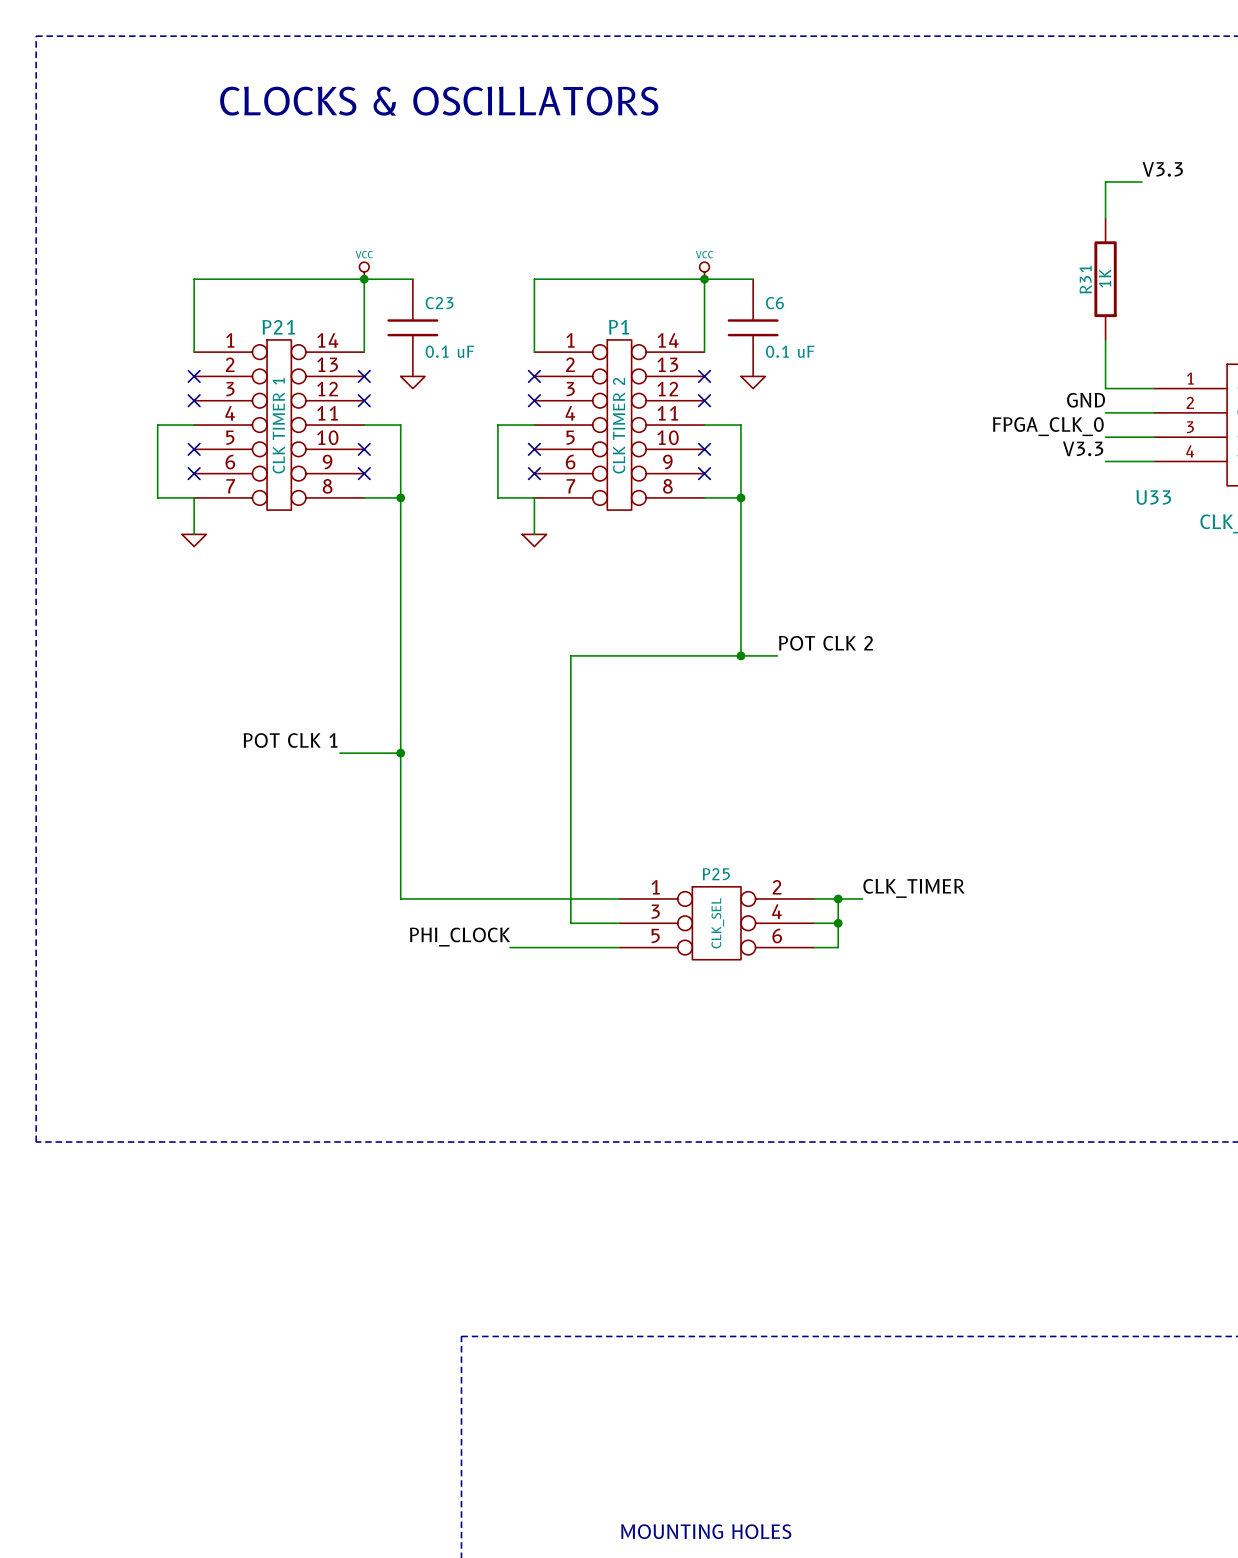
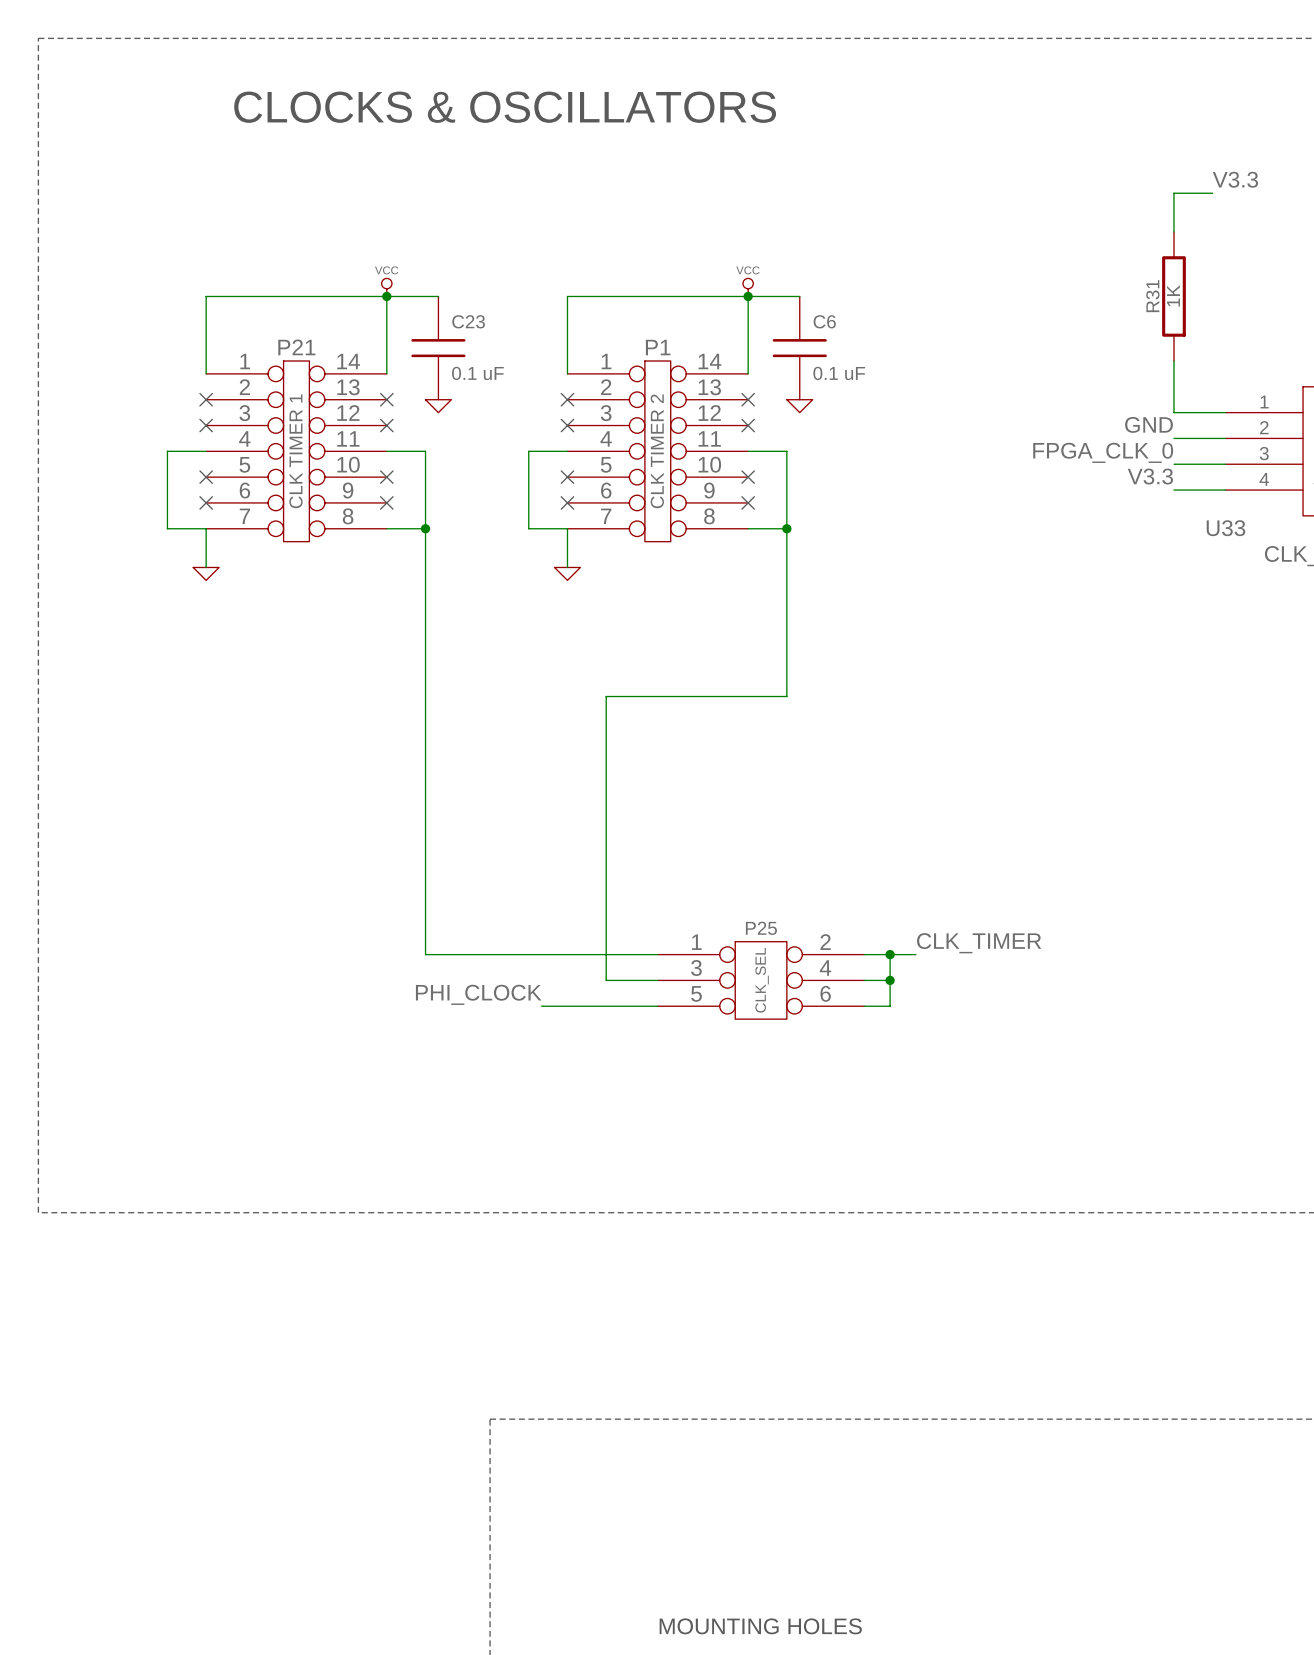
label: POT CLK 2 (825, 643) -> none
wire: (740, 655) (777, 655) -> none
junction: (740, 655) -> none
label: POT CLK 1 (290, 740) -> none
wire: (339, 753) (400, 753) -> none
junction: (400, 753) -> none

